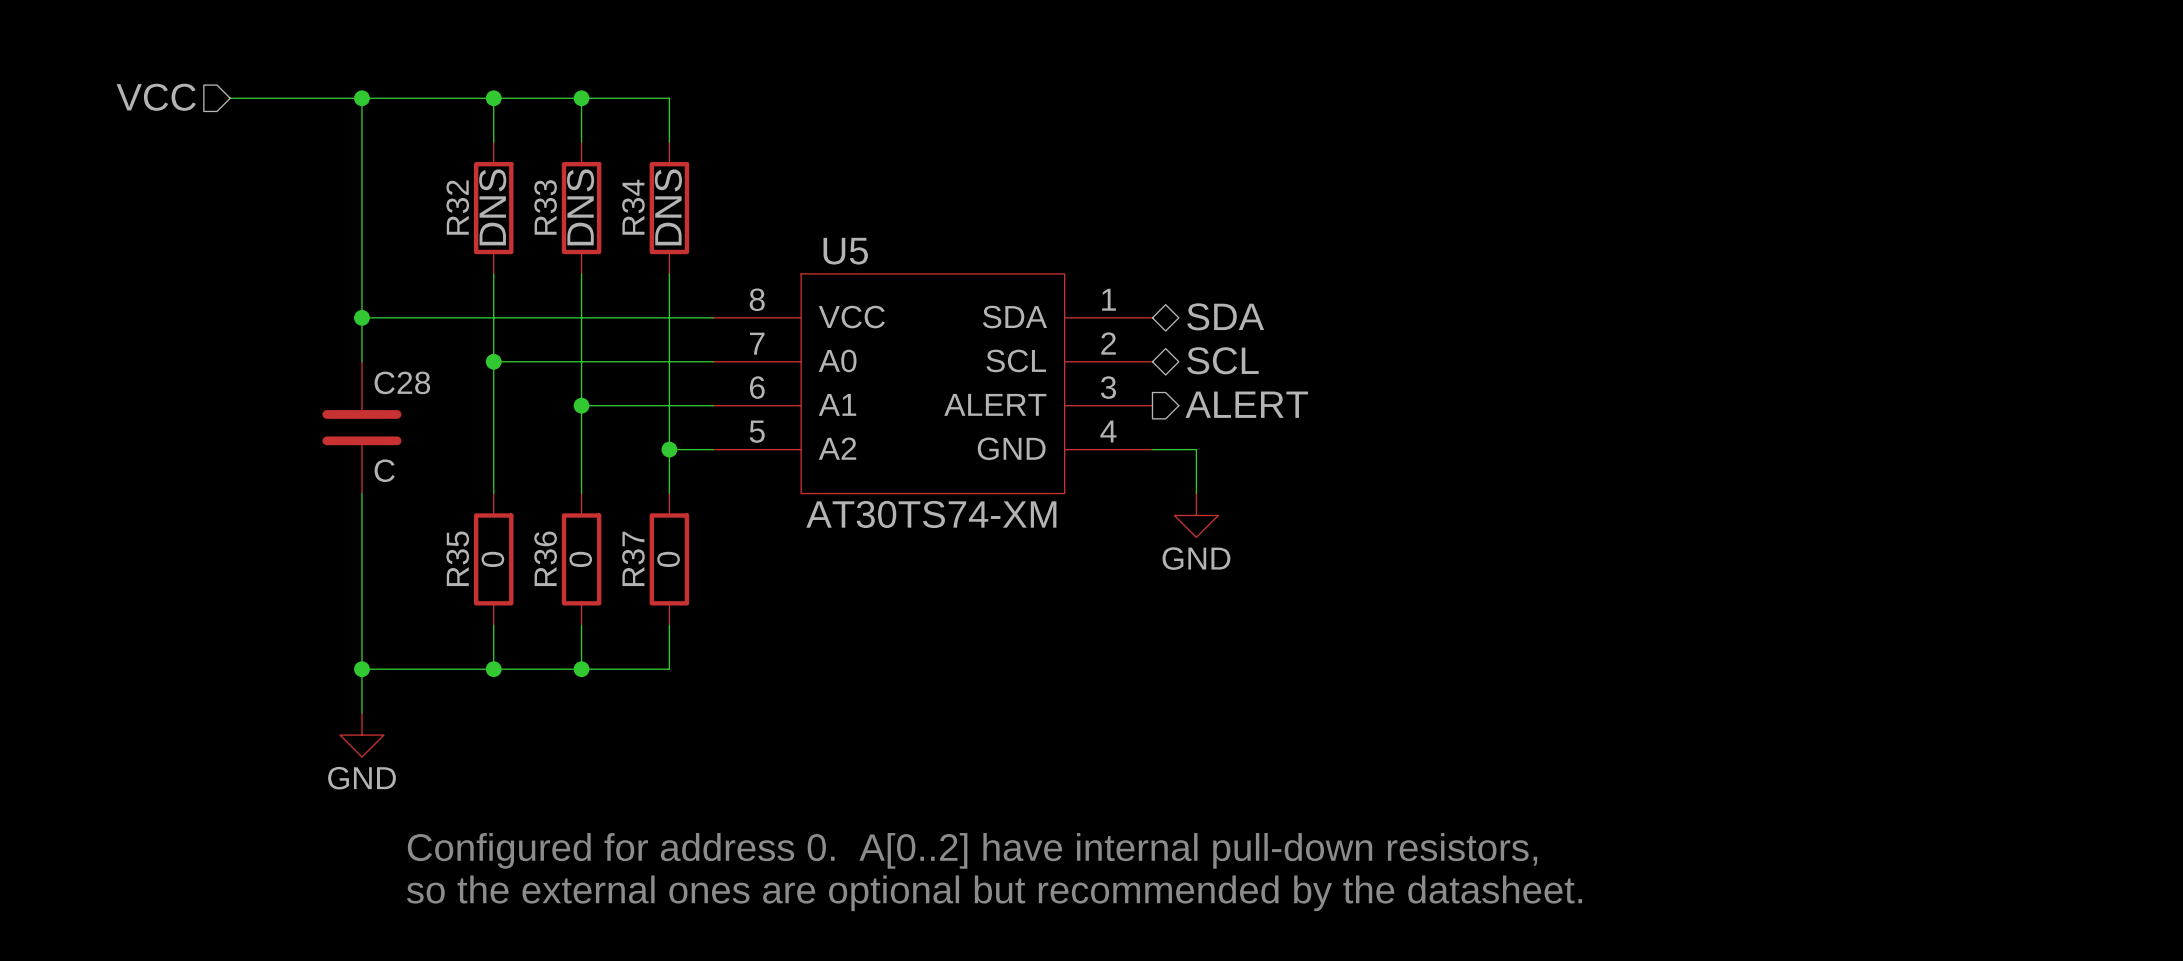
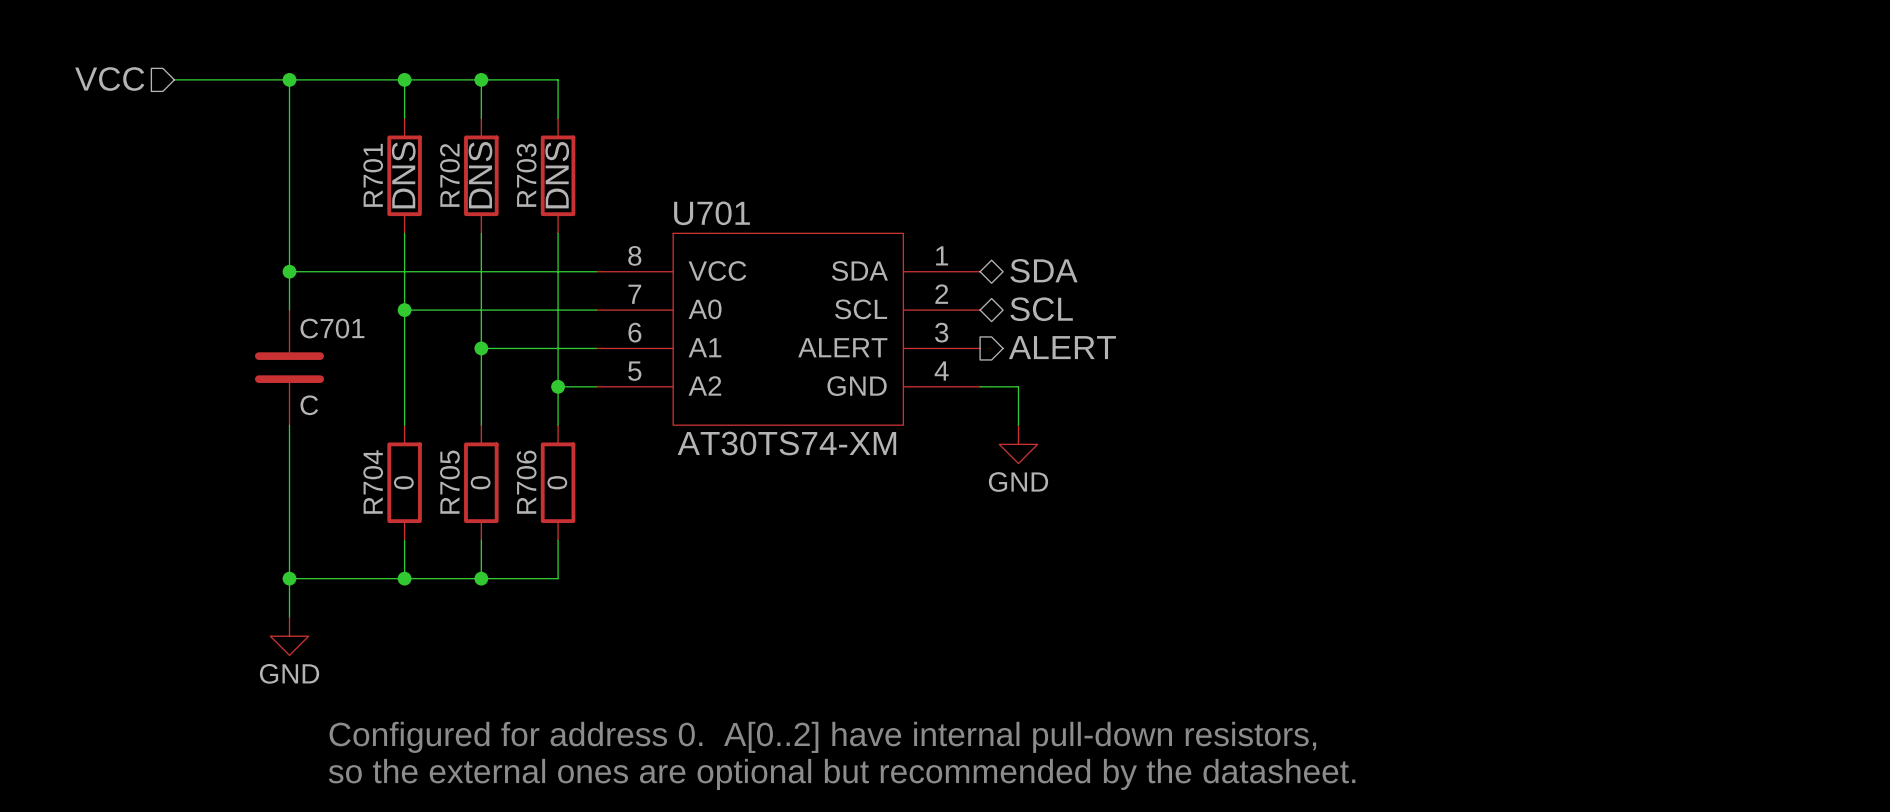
R32 name: R32 (457, 207) -> R701 (373, 175)
R33 name: R33 (545, 207) -> R702 (449, 175)
R34 name: R34 (633, 207) -> R703 (526, 175)
U5 name: U5 (845, 251) -> U701 (712, 213)
C28 name: C28 (402, 382) -> C701 (332, 328)
R35 name: R35 (457, 558) -> R704 (373, 482)
R36 name: R36 (545, 558) -> R705 (449, 482)
R37 name: R37 (633, 558) -> R706 (526, 482)

